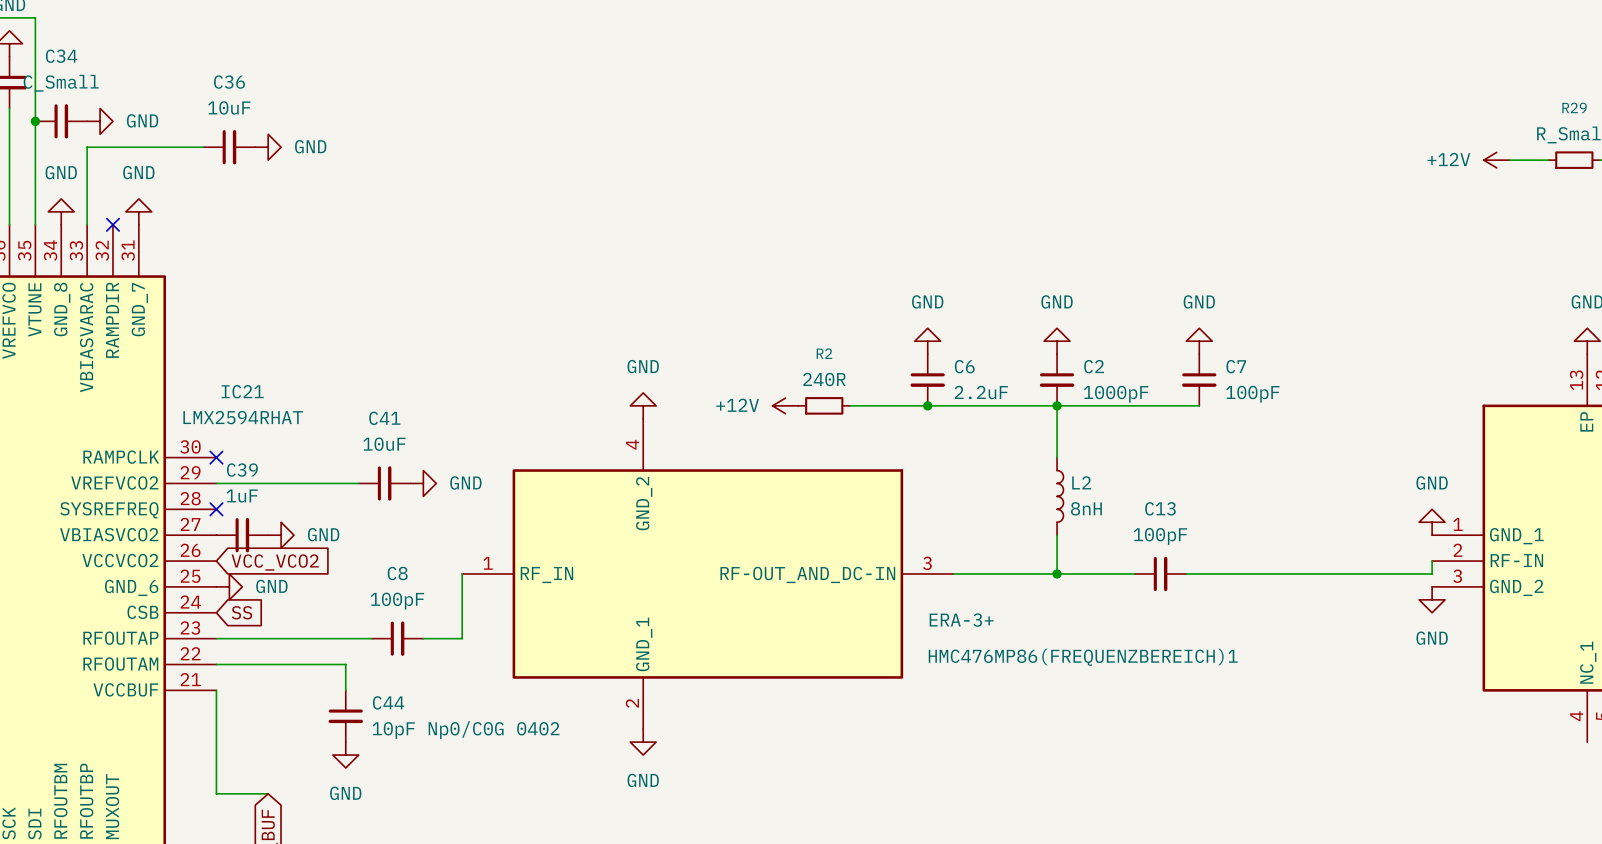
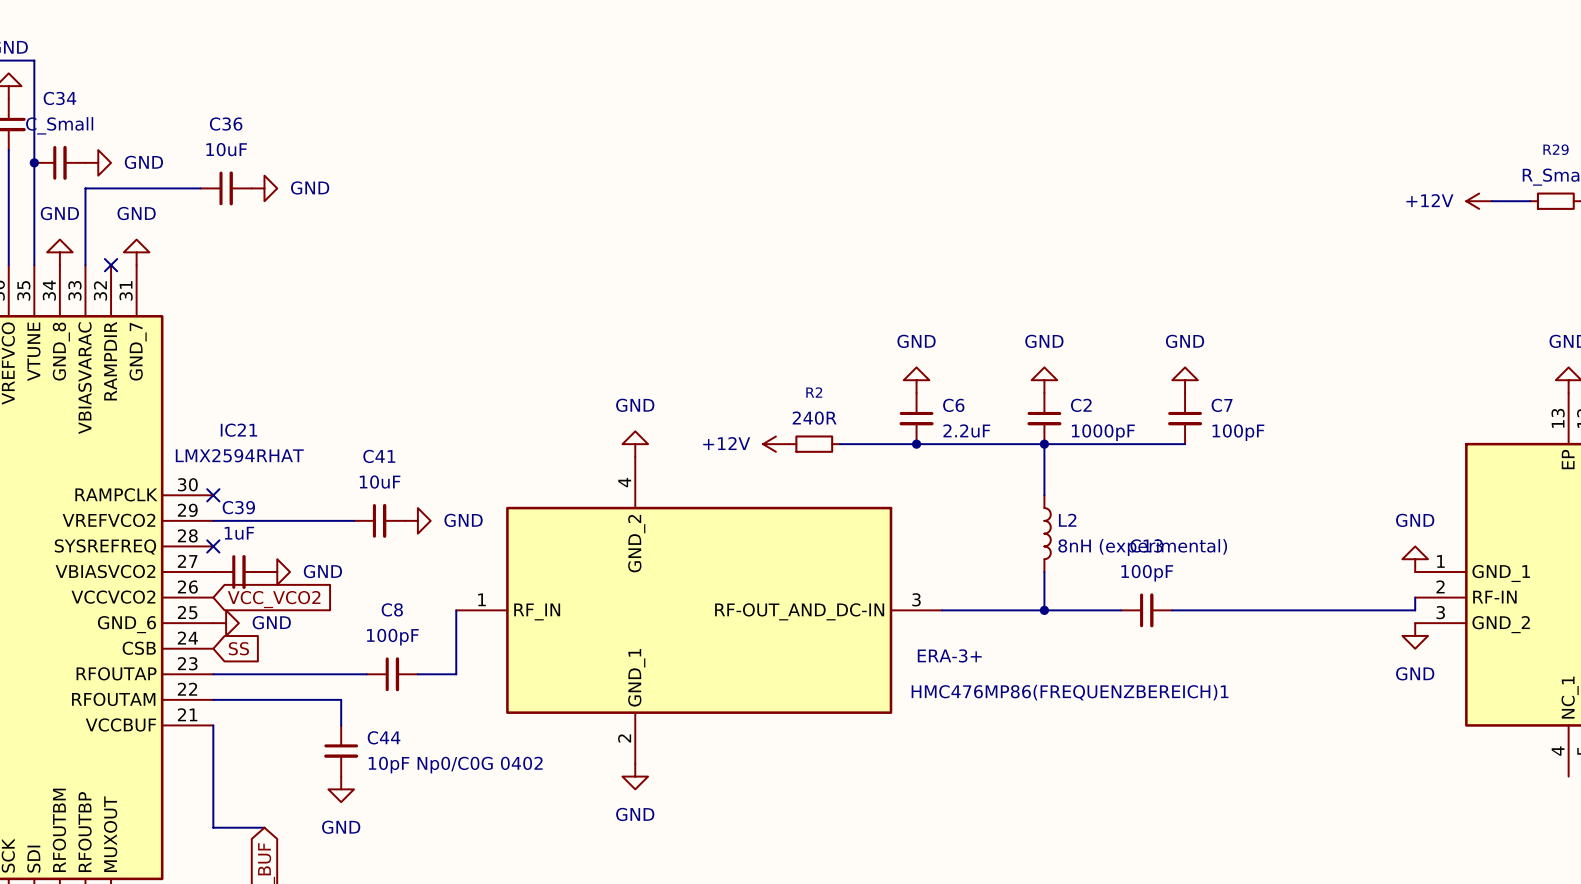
L2 value: 8nH (1086, 508) -> 8nH (experimental) (1142, 547)

